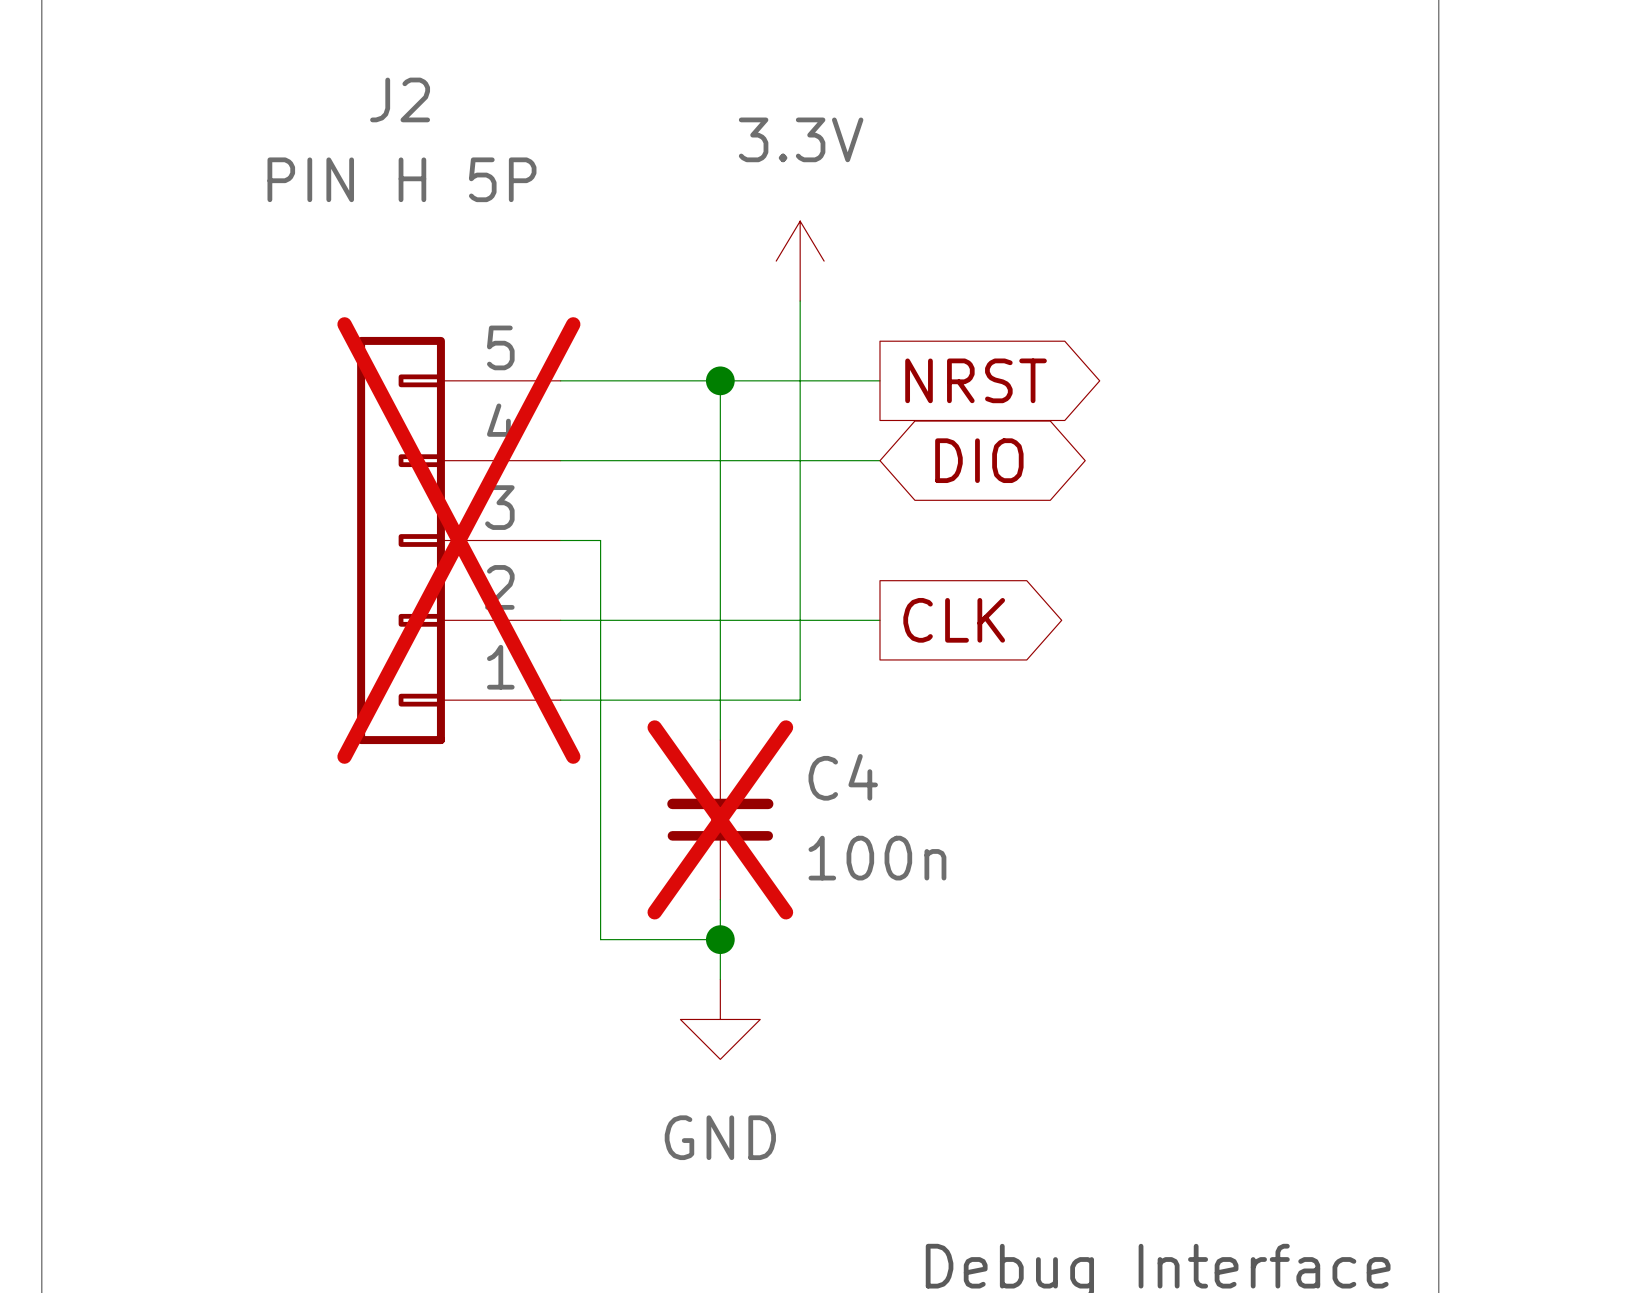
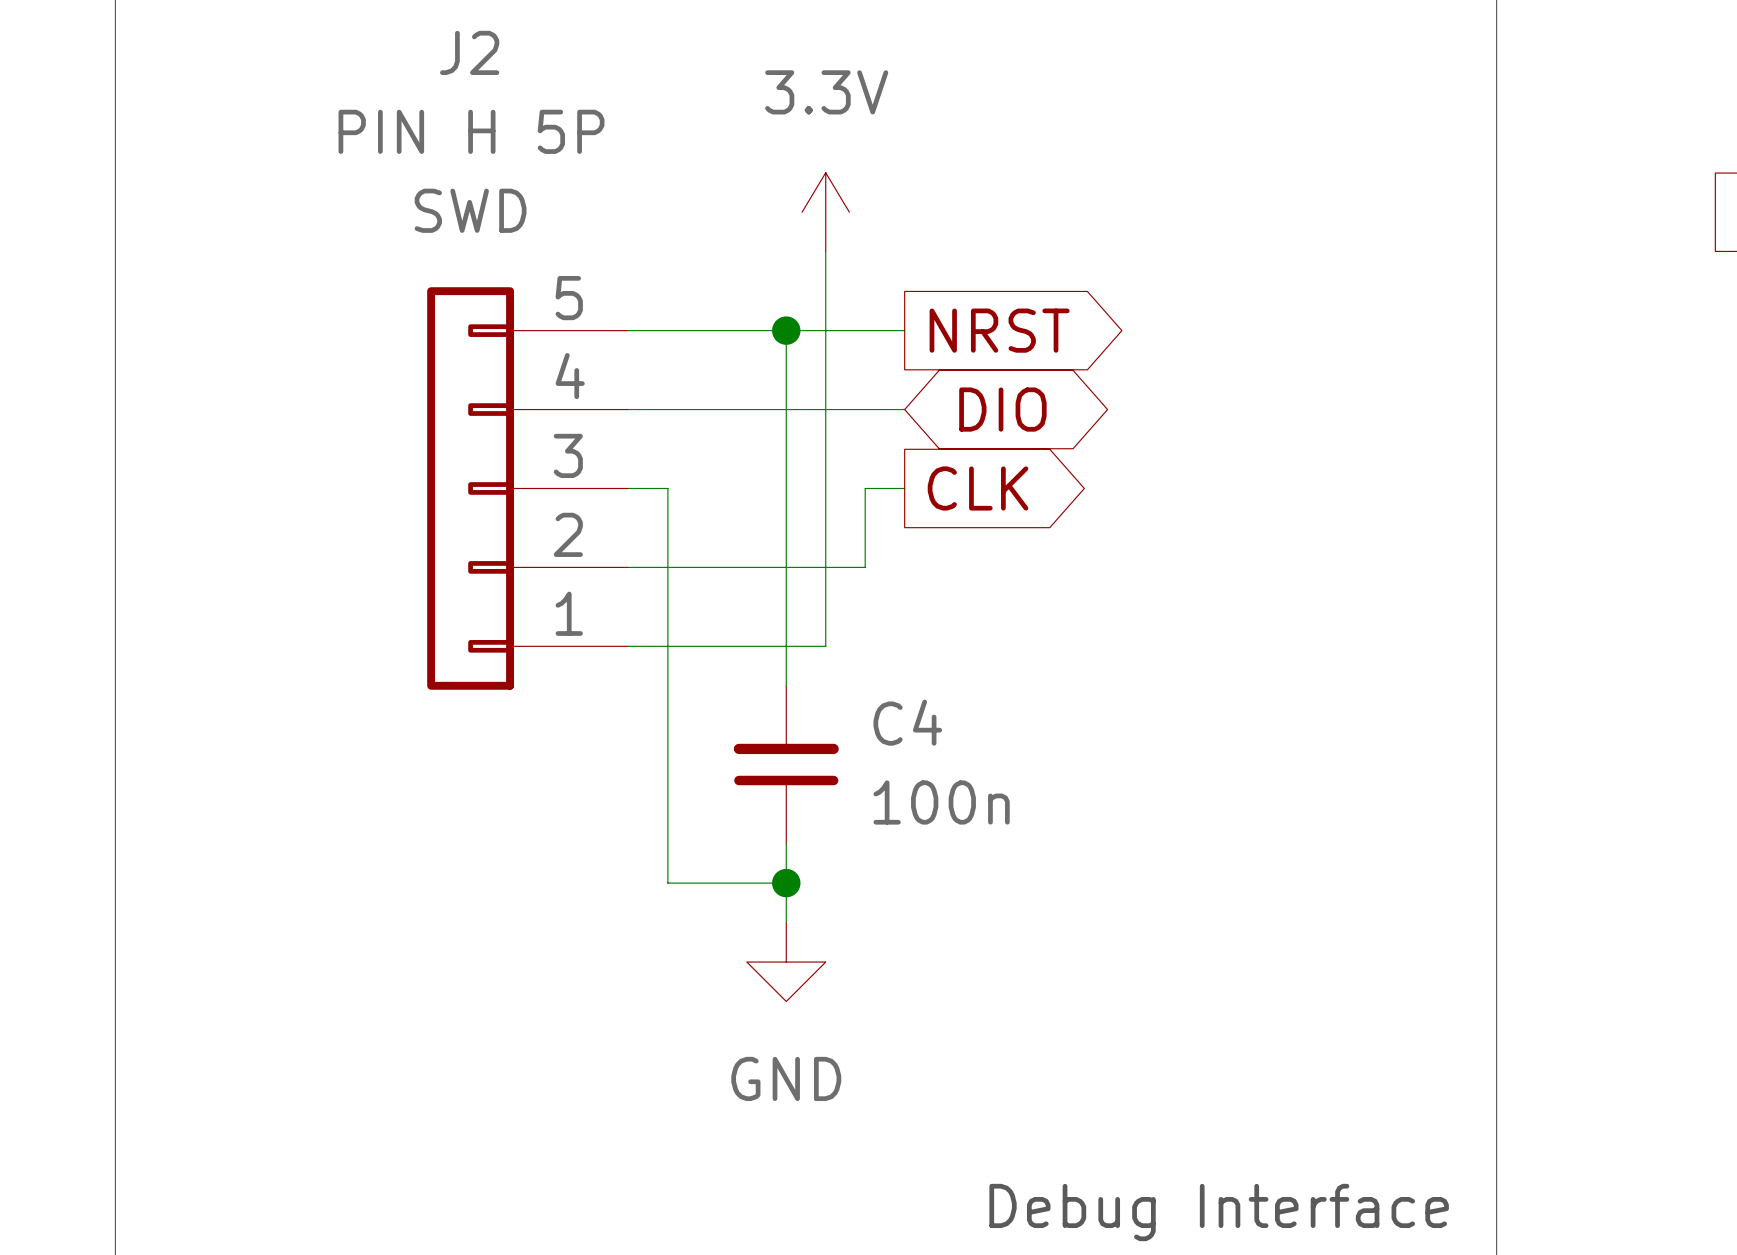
J2 text: none -> SWD (470, 210)
power symbol position: 3.3V (800, 261) -> 3.3V (825, 212)
wire: (800, 301) (800, 540) -> (904, 488) (865, 488)
wire: (840, 380) (879, 380) -> none
global label position: NRST (976, 380) -> NRST (999, 330)
wire: (840, 460) (879, 460) -> none
global label position: DIO (979, 460) -> DIO (1002, 409)
J2 do-not-place cross: (458, 540) -> none
wire: (879, 620) (800, 620) (800, 700) (760, 700) -> (825, 251) (825, 646)
global label position: CLK (954, 620) -> CLK (978, 488)
C4 do-not-place cross: (720, 819) -> none

